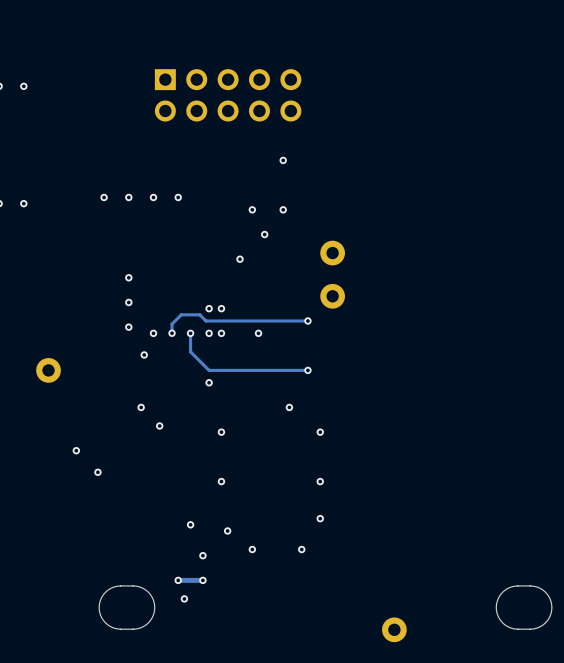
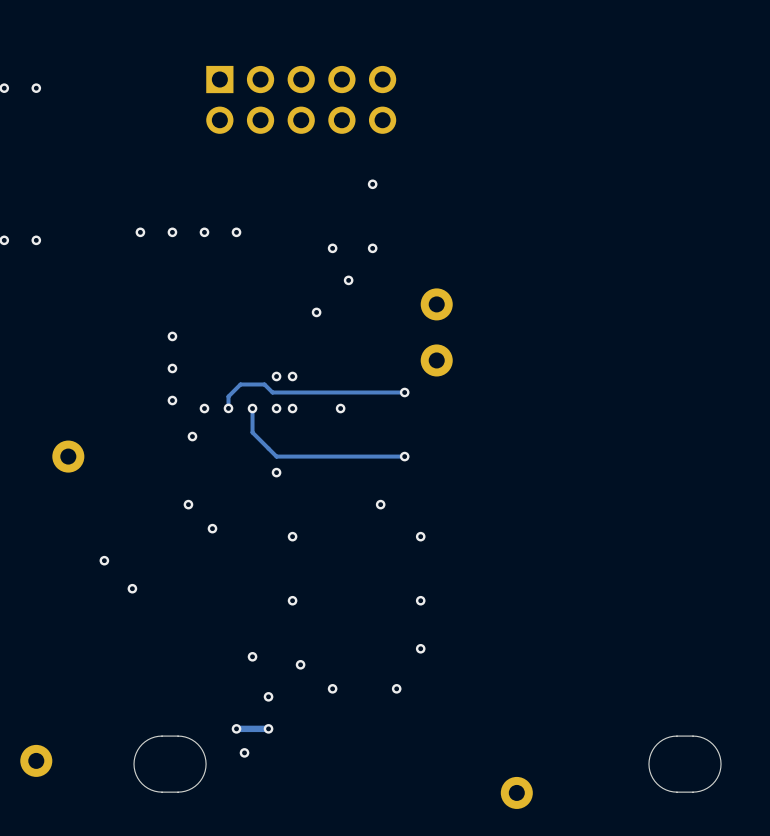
part: none -> (36, 760)

